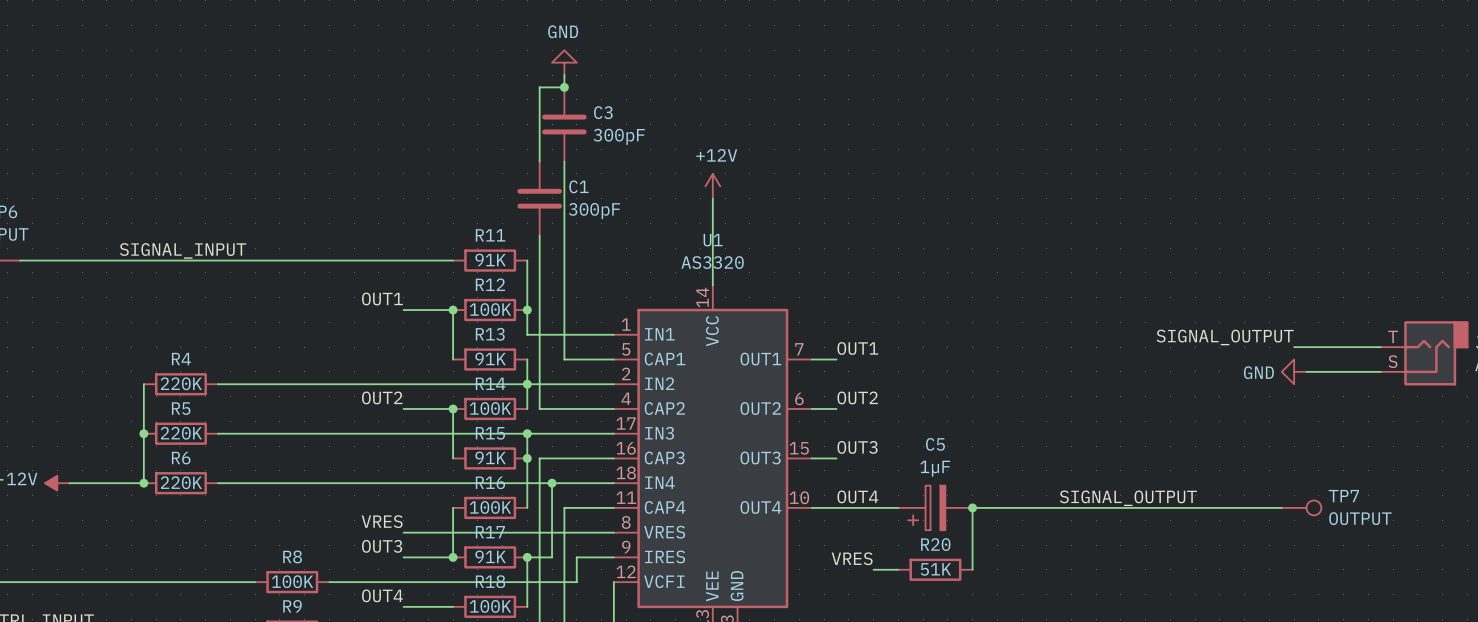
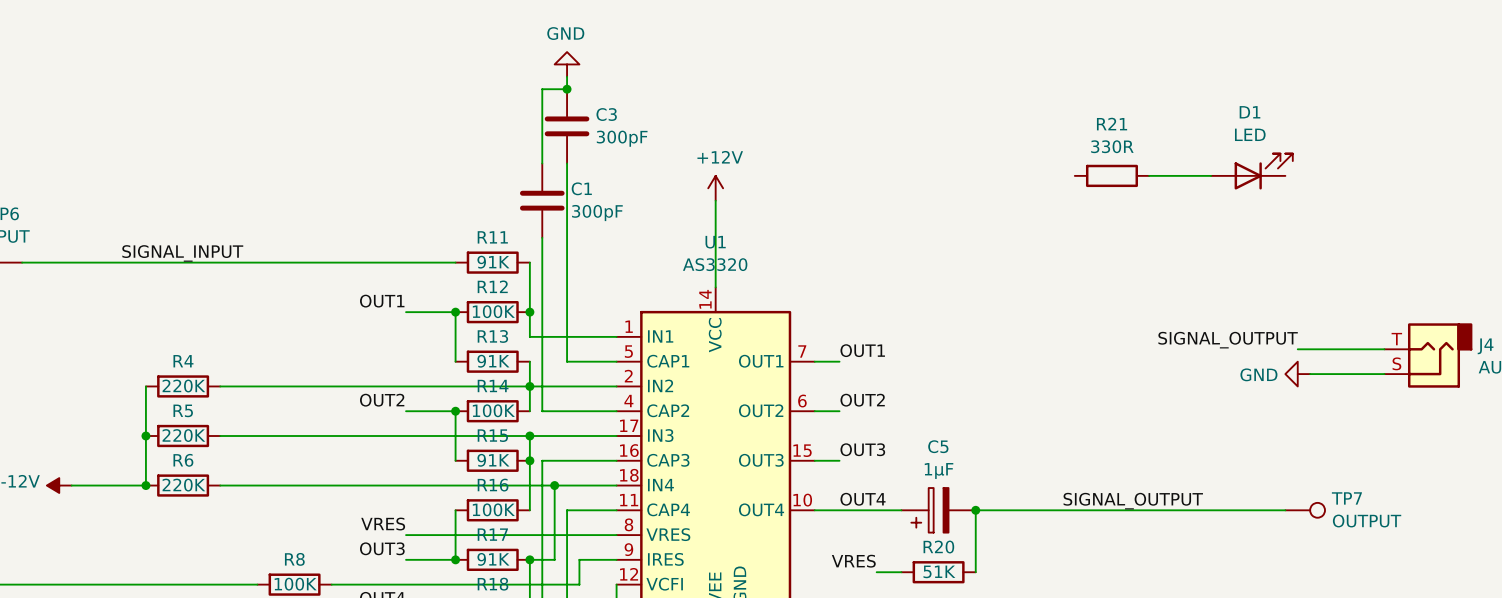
D1: none -> LED (1251, 171)
R21: none -> 330R (1111, 175)
wire: none -> (1149, 175) (1211, 175)

